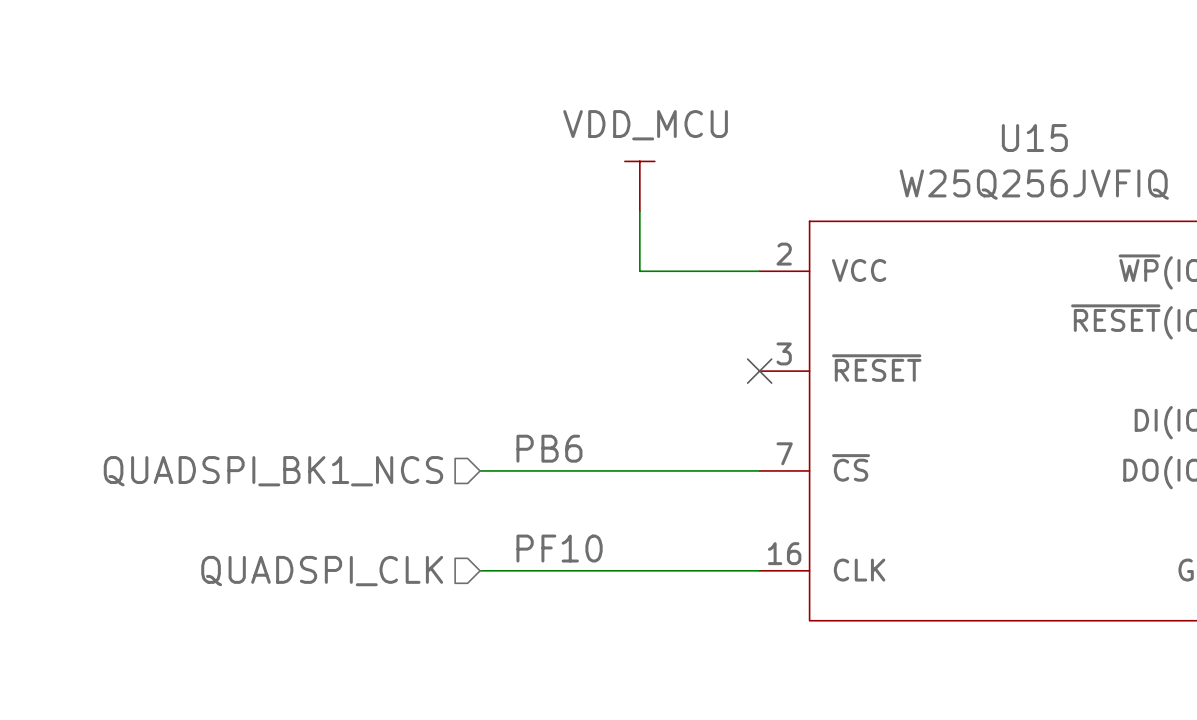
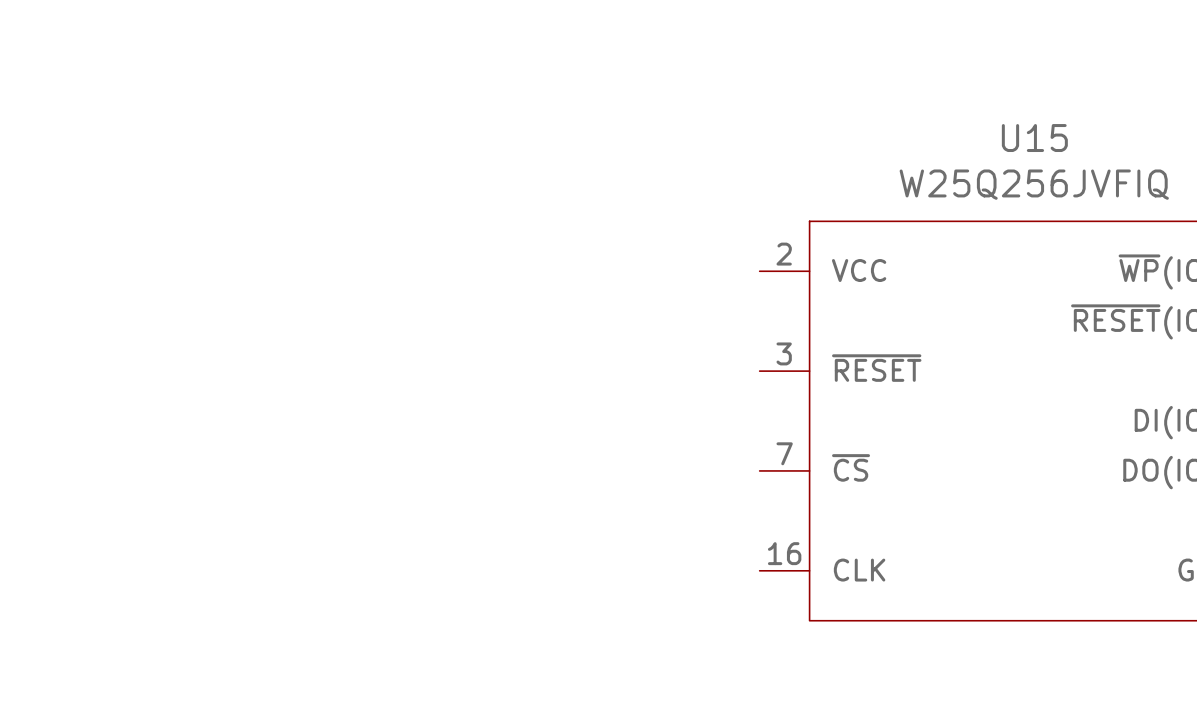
power symbol: VDD_MCU (639, 186) -> none
wire: (639, 211) (639, 271) (759, 271) -> none
no-connect mark: (759, 371) -> none
label: PB6 (549, 448) -> none
wire: (480, 470) (759, 470) -> none
hierarchical label: QUADSPI_BK1_NCS (273, 471) -> none
label: PF10 (559, 548) -> none
wire: (480, 570) (759, 570) -> none
hierarchical label: QUADSPI_CLK (322, 571) -> none

